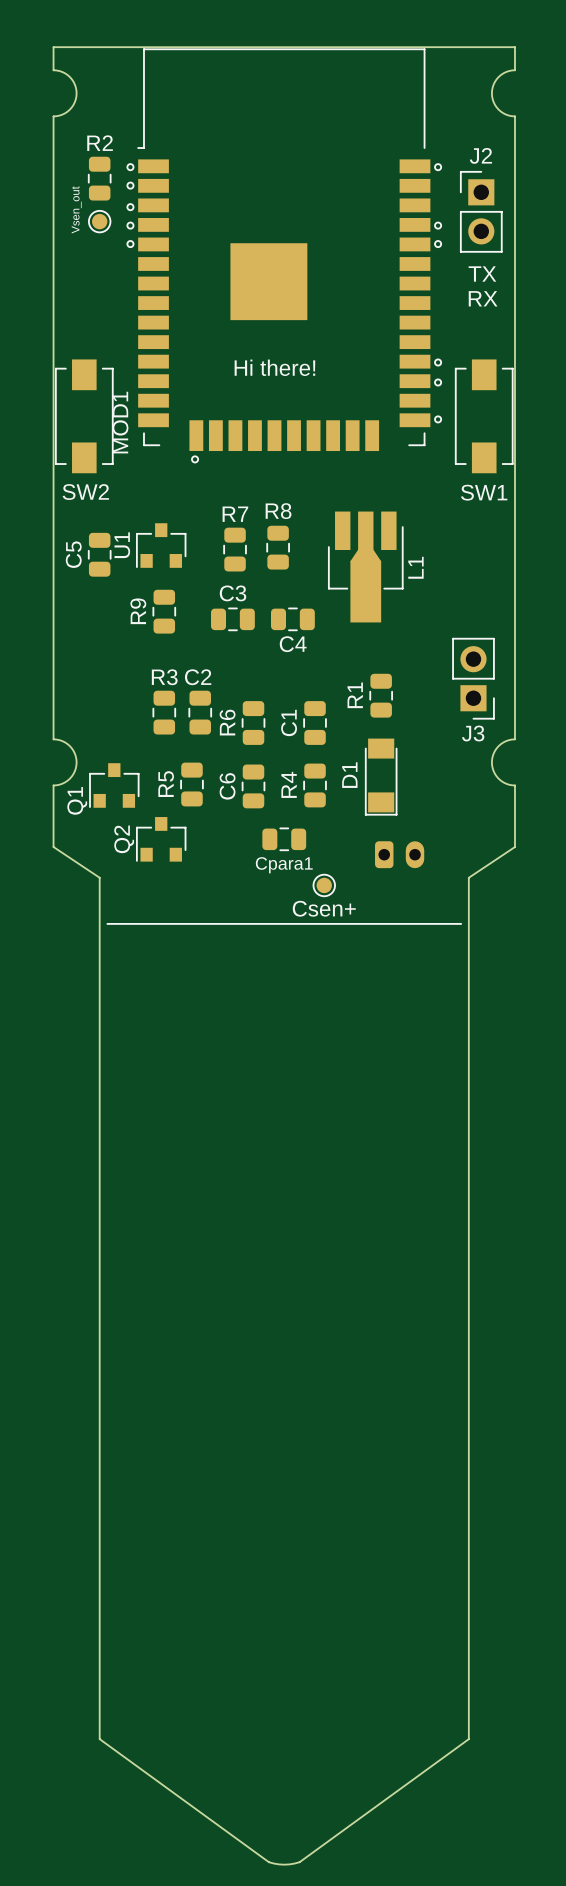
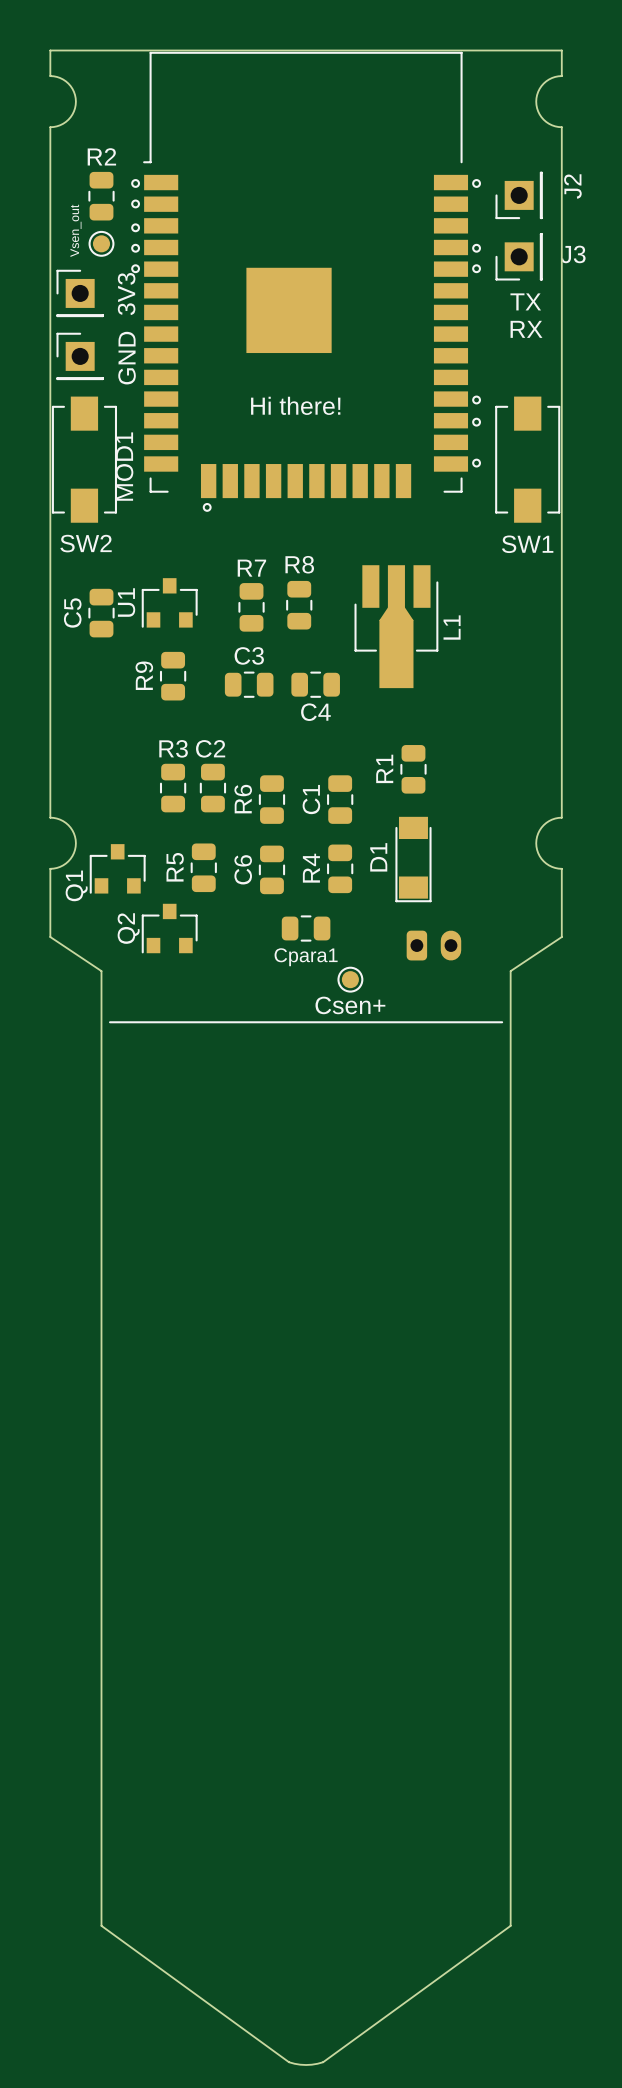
J2 name position: J2 (480, 155) -> J2 (572, 186)
J2 footprint: [459, 170, 503, 253] -> [495, 171, 543, 220]
3V3: none -> (80, 293)
GND: none -> (80, 356)
J3 footprint: [452, 637, 495, 720] -> [495, 233, 543, 281]
J3 name position: J3 (473, 733) -> J3 (573, 254)

